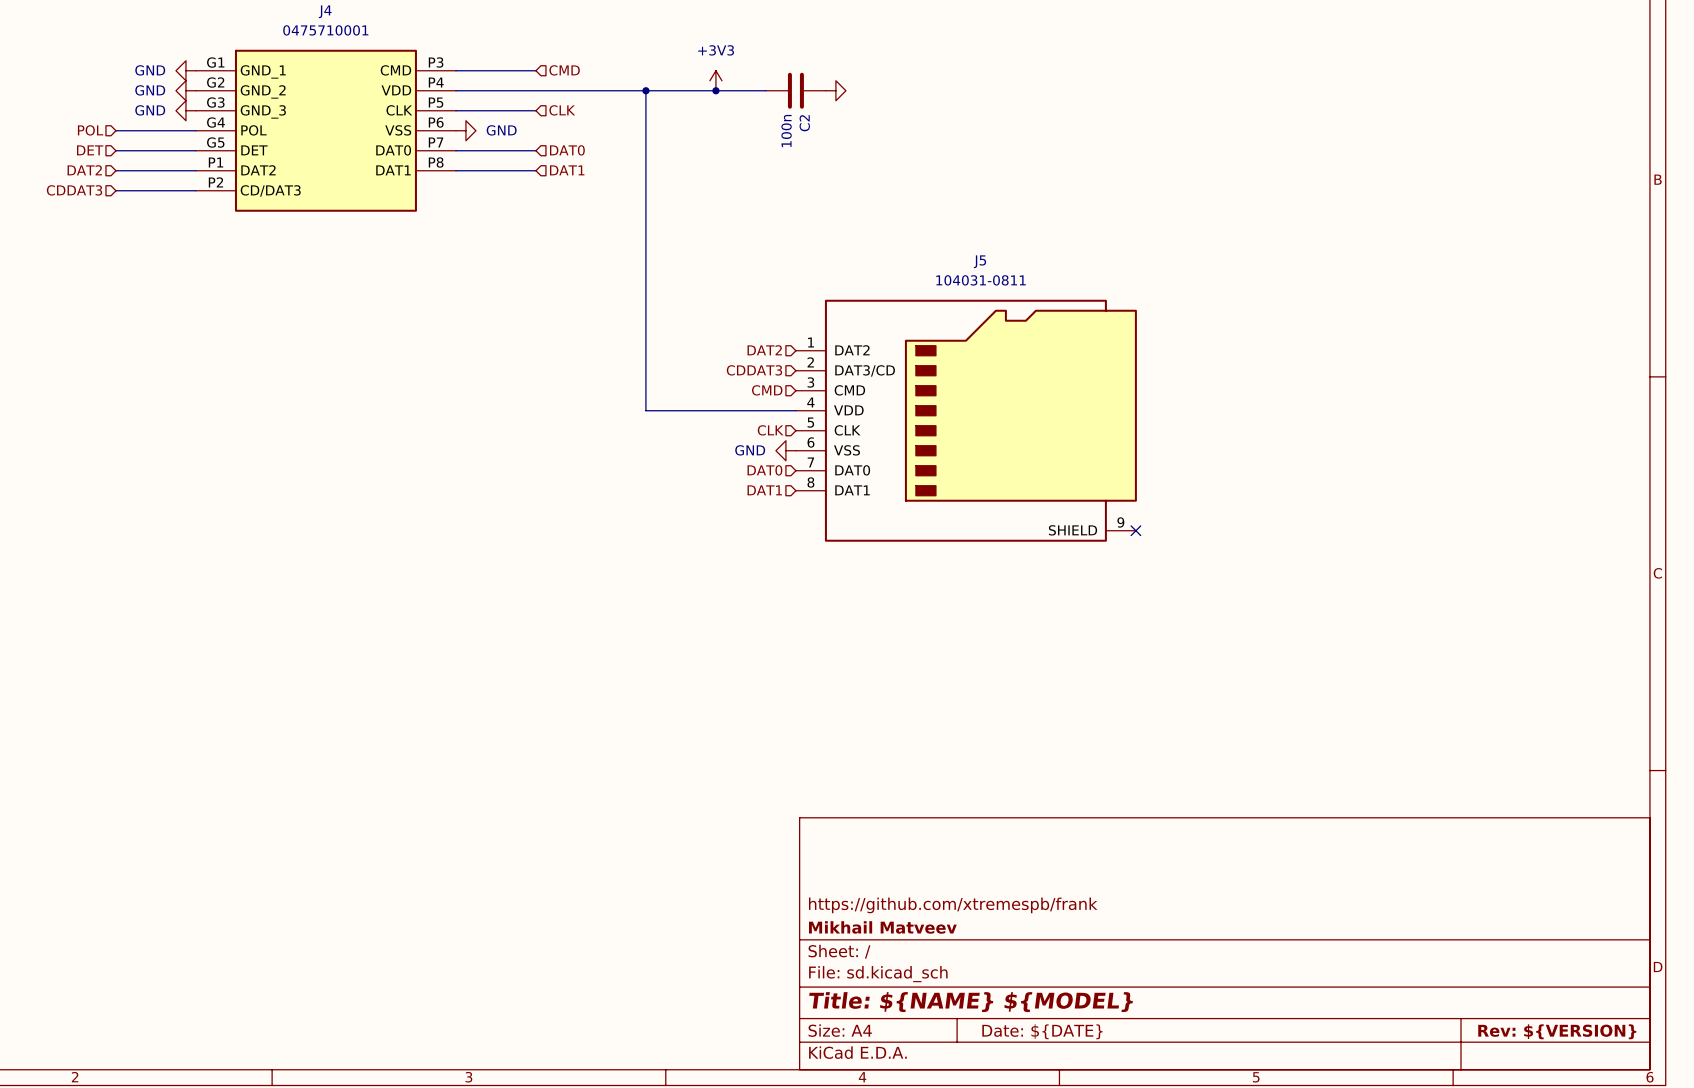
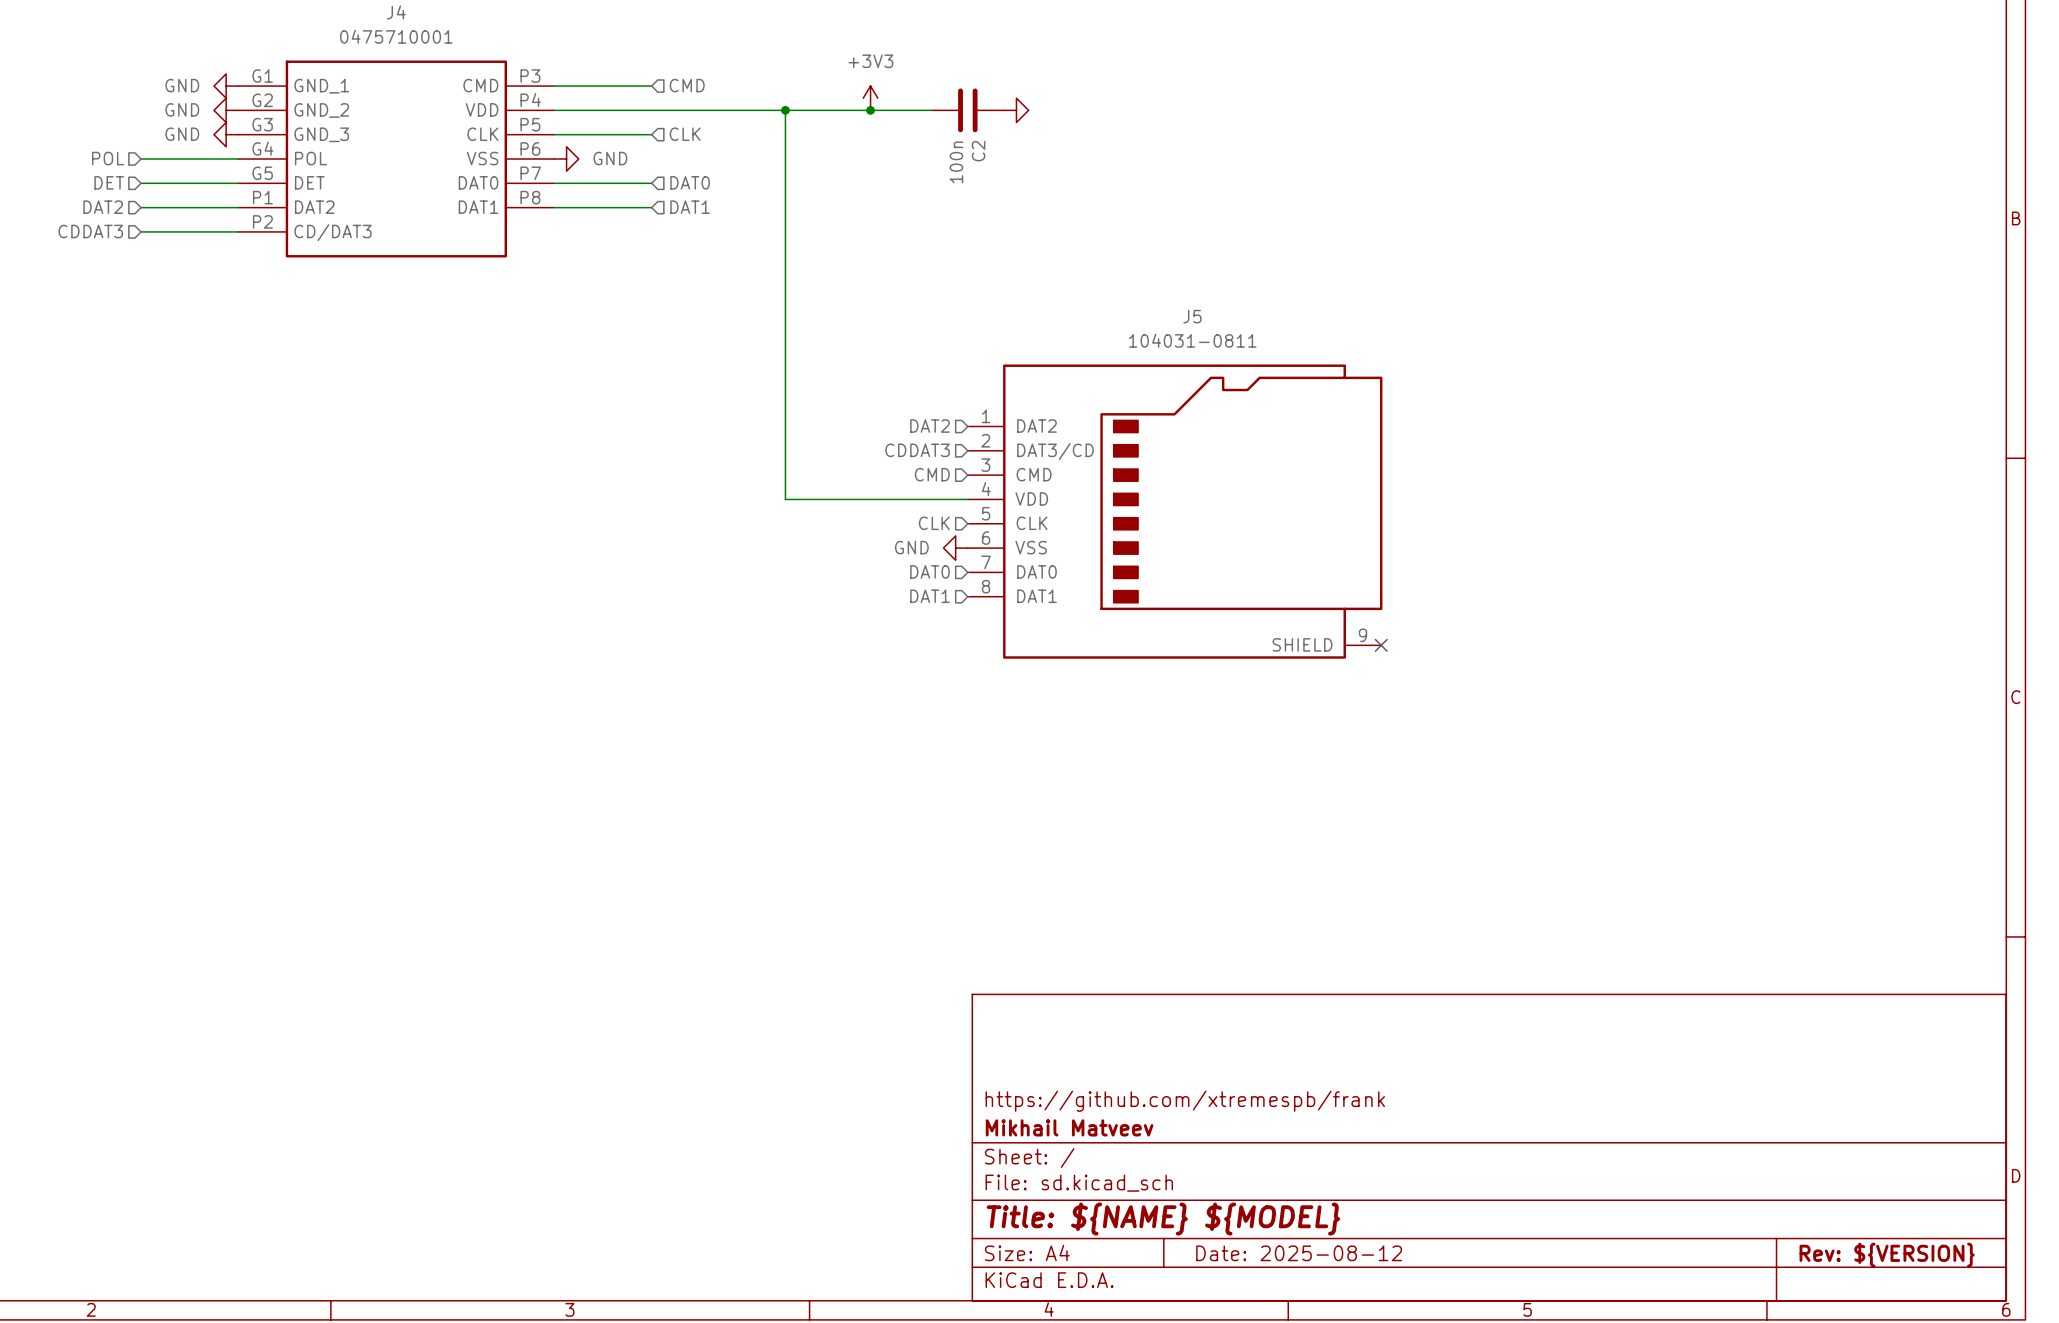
title block: Date: ${DATE} (1042, 1031) -> Date: 2025-08-12 (1299, 1253)

